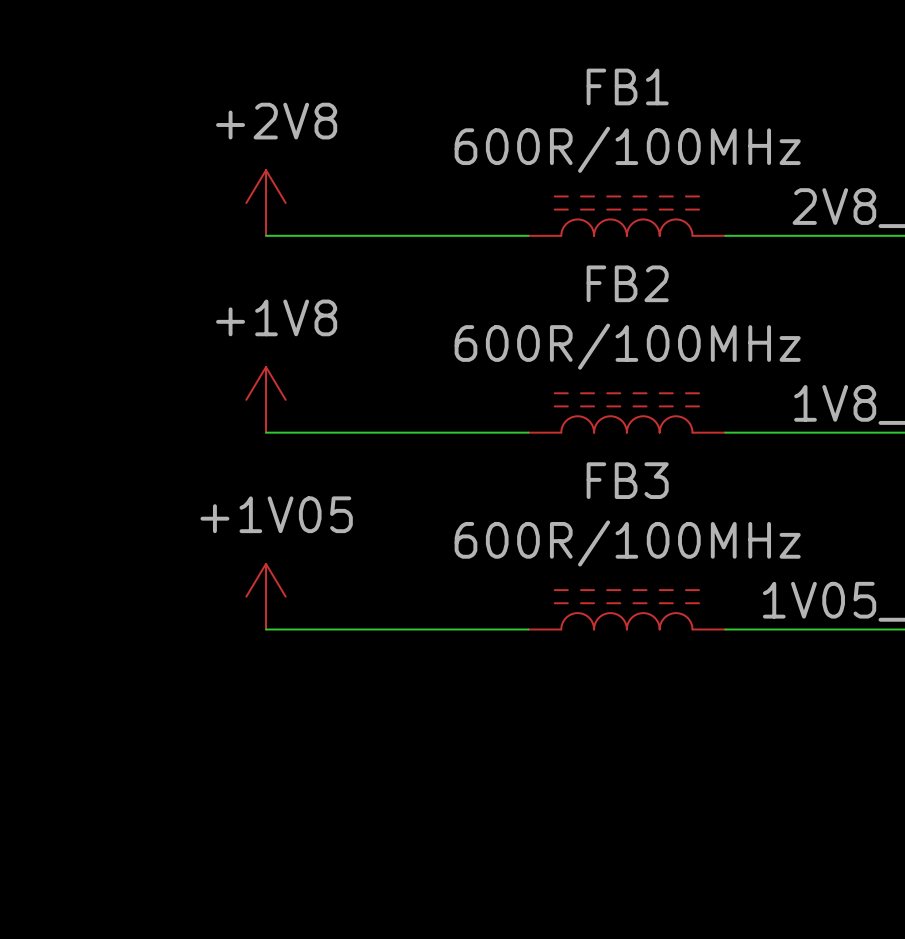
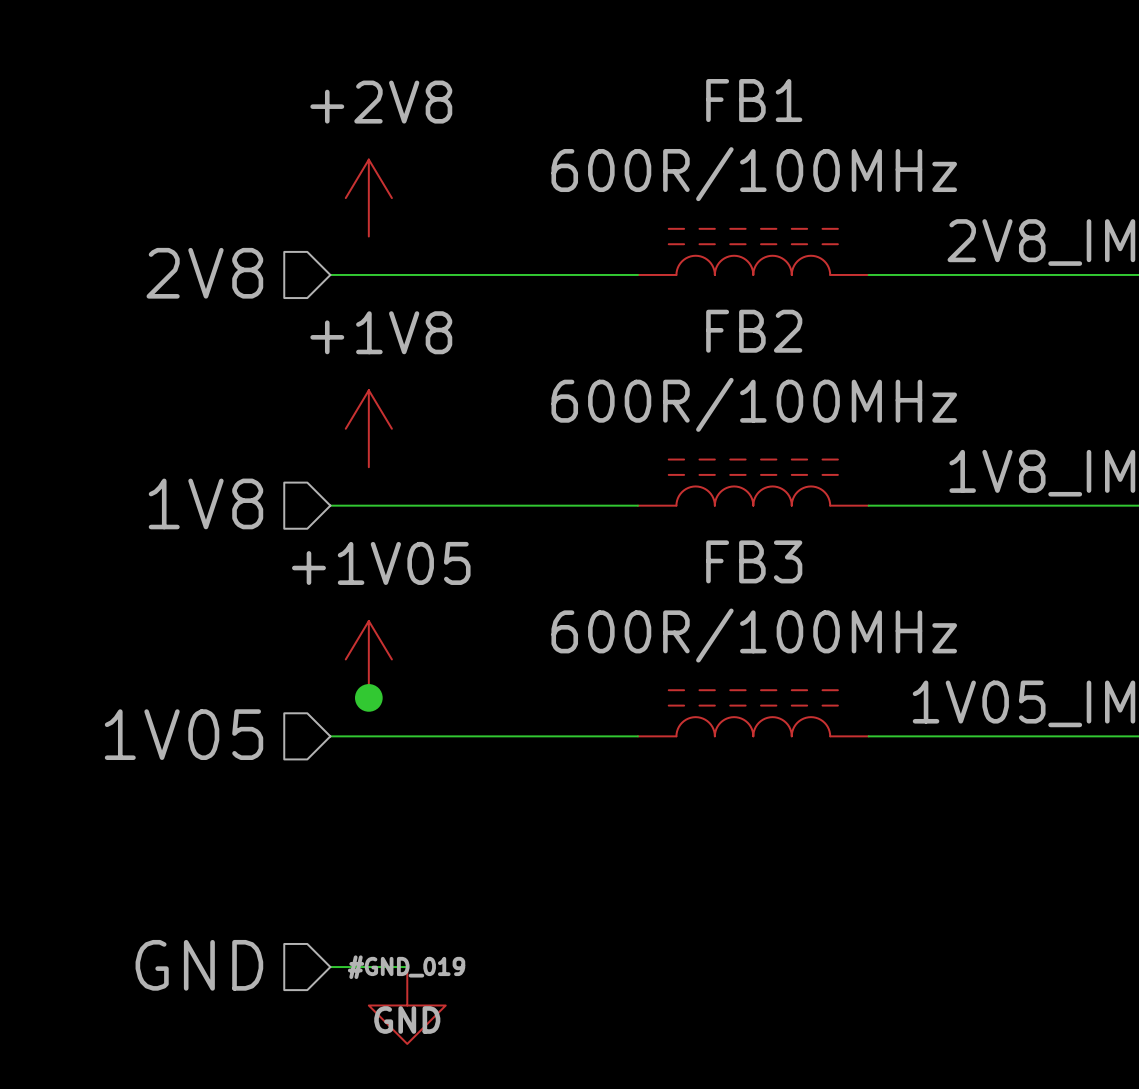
power symbol position: +2V8 (266, 203) -> +2V8 (368, 198)
hierarchical label: none -> 2V8 (204, 273)
power symbol position: +1V8 (266, 399) -> +1V8 (368, 428)
hierarchical label: none -> 1V8 (205, 503)
power symbol position: +1V05 (266, 596) -> +1V05 (368, 659)
junction: none -> (368, 697)
hierarchical label: none -> 1V05 (184, 734)
hierarchical label: none -> GND (199, 965)
wire: none -> (330, 967) (407, 967)
#GND_019: none -> GND (407, 1005)

